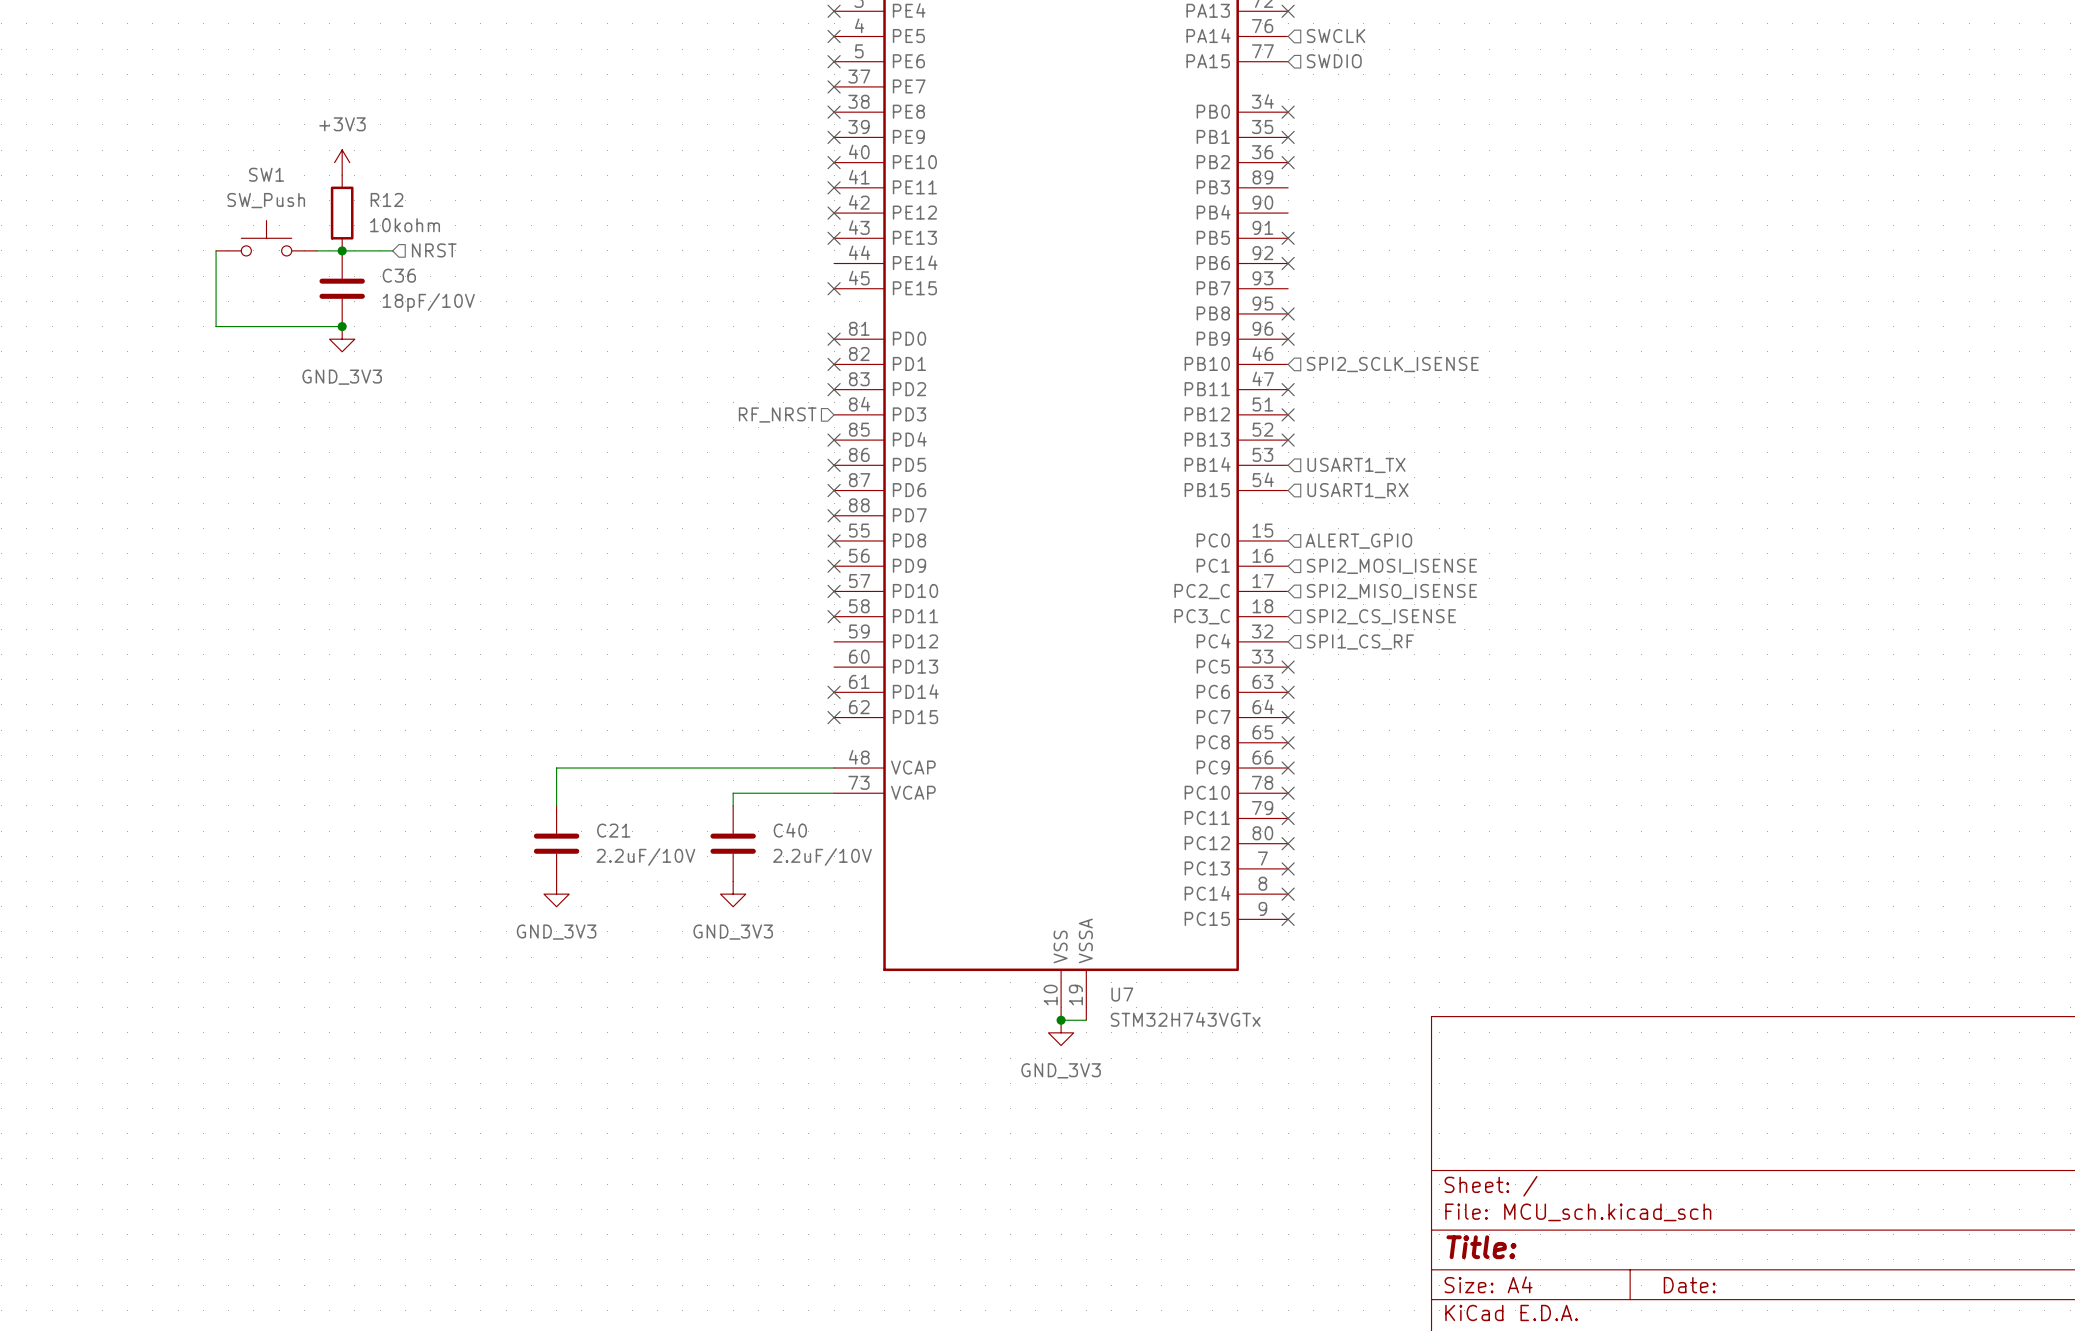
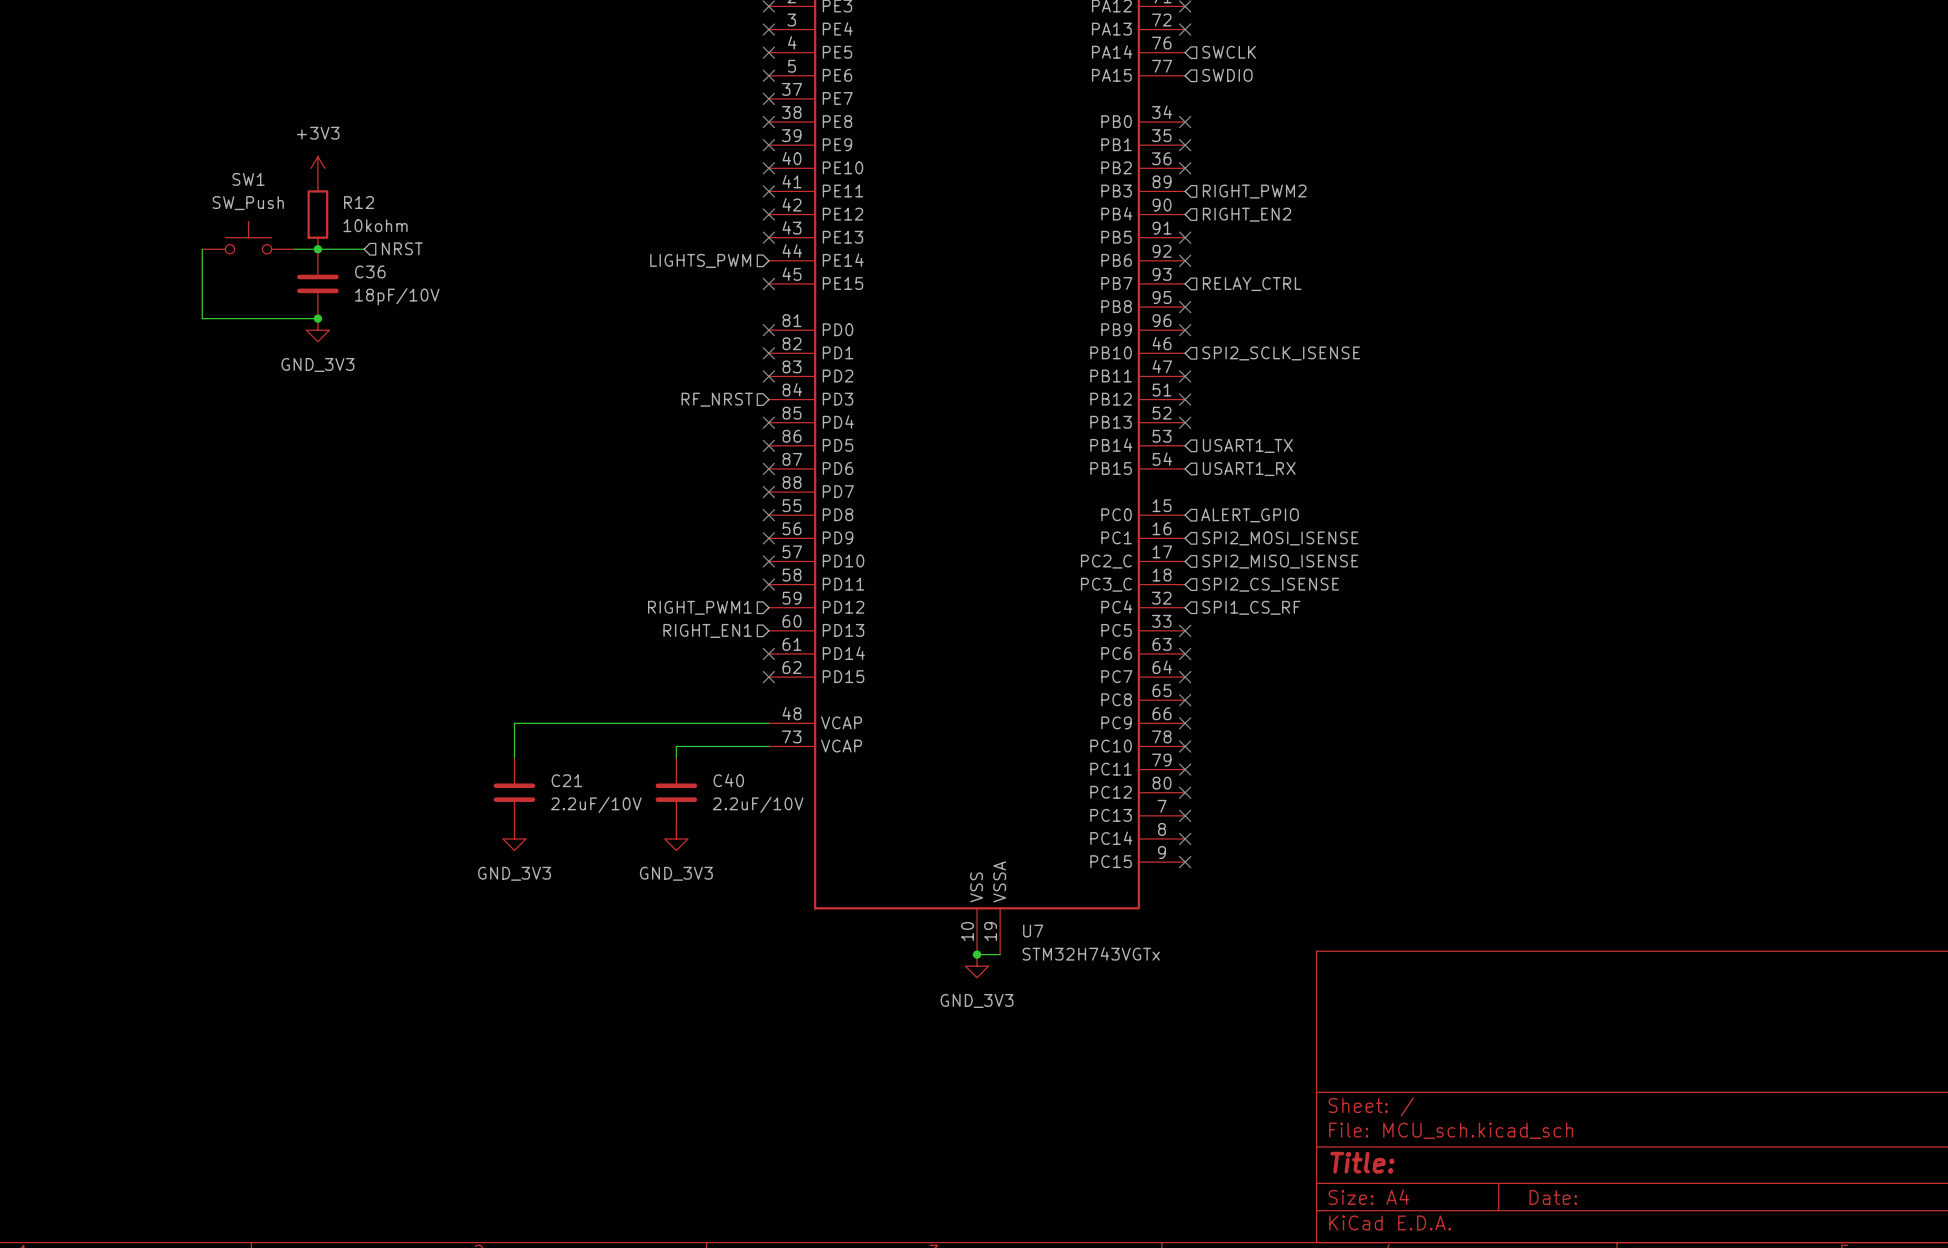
hierarchical label: none -> RIGHT_PWM2 (1254, 191)
hierarchical label: none -> RIGHT_EN2 (1247, 214)
hierarchical label: none -> LIGHTS_PWM (700, 260)
hierarchical label: none -> RELAY_CTRL (1252, 284)
hierarchical label: none -> RIGHT_PWM1 (699, 607)
hierarchical label: none -> RIGHT_EN1 (707, 630)

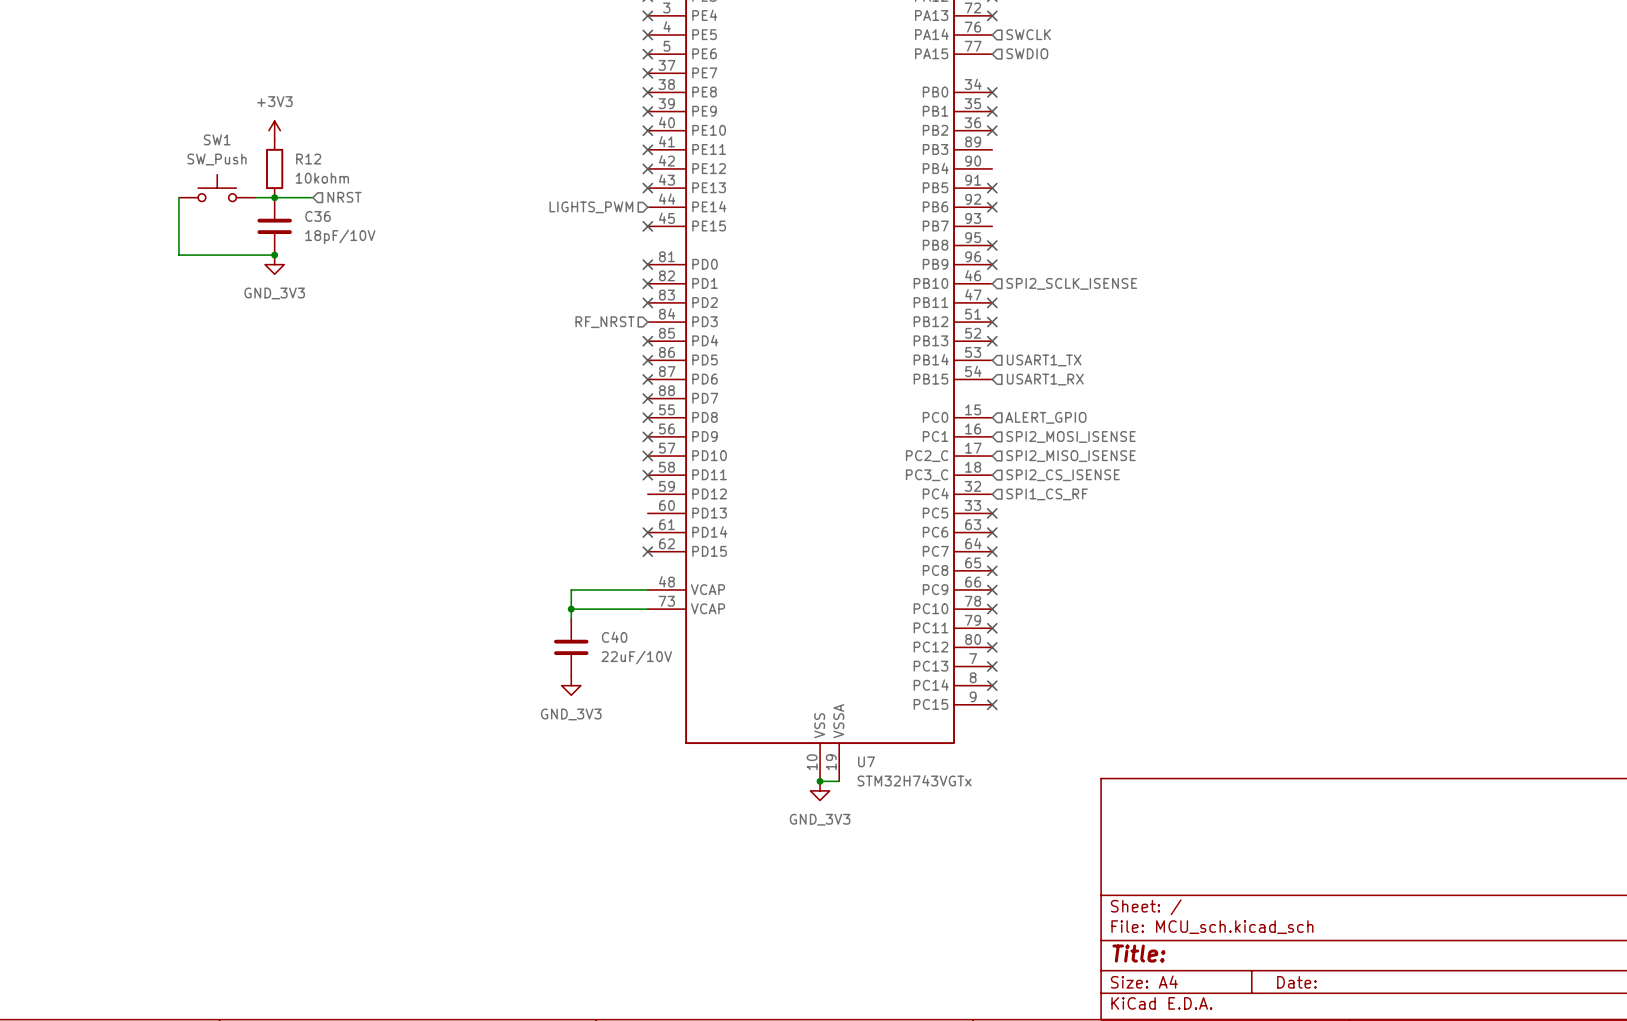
hierarchical label: RIGHT_PWM2 (1254, 191) -> none
hierarchical label: RIGHT_EN2 (1247, 214) -> none
hierarchical label: RELAY_CTRL (1252, 284) -> none
hierarchical label: RIGHT_PWM1 (699, 607) -> none
hierarchical label: RIGHT_EN1 (707, 630) -> none
wire: (676, 723) (514, 723) (514, 758) -> (571, 589) (571, 609)
junction: none -> (571, 609)
C21: 2.2uF/10V (514, 792) -> none
C40 value: 2.2uF/10V (758, 804) -> 22uF/10V (636, 657)
power symbol: GND_3V3 (514, 838) -> none

